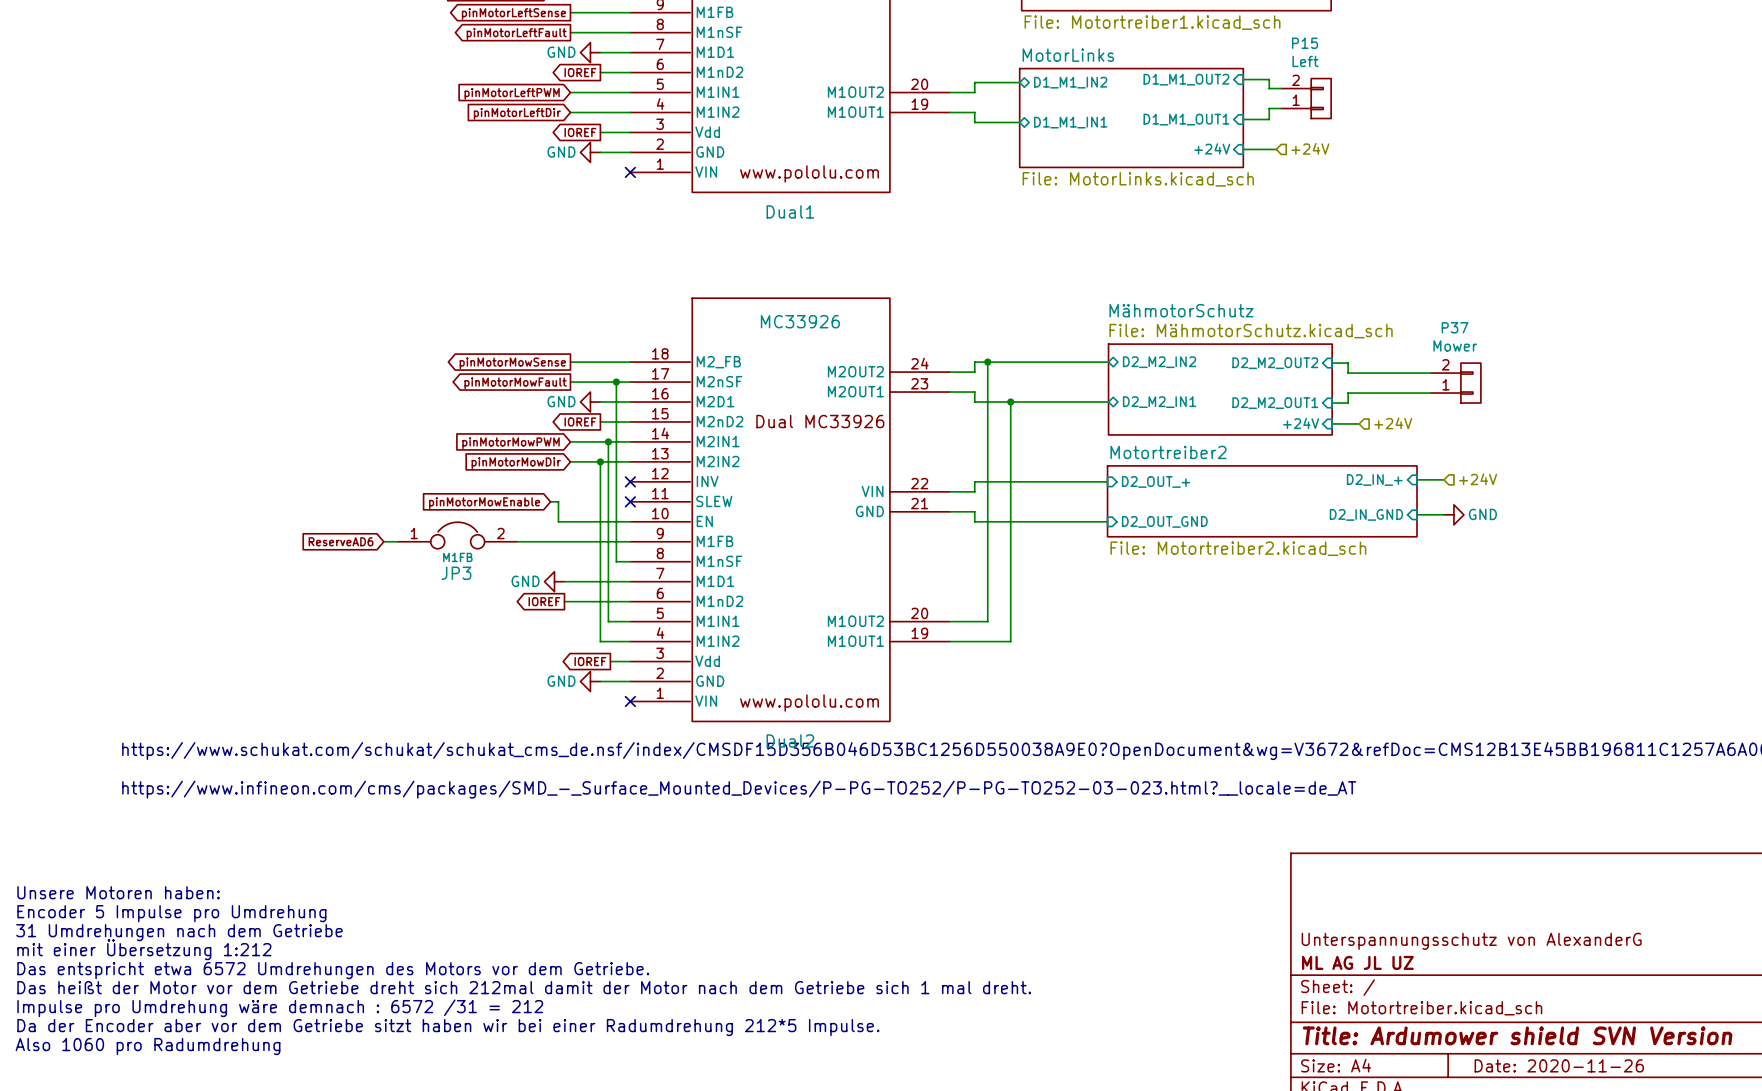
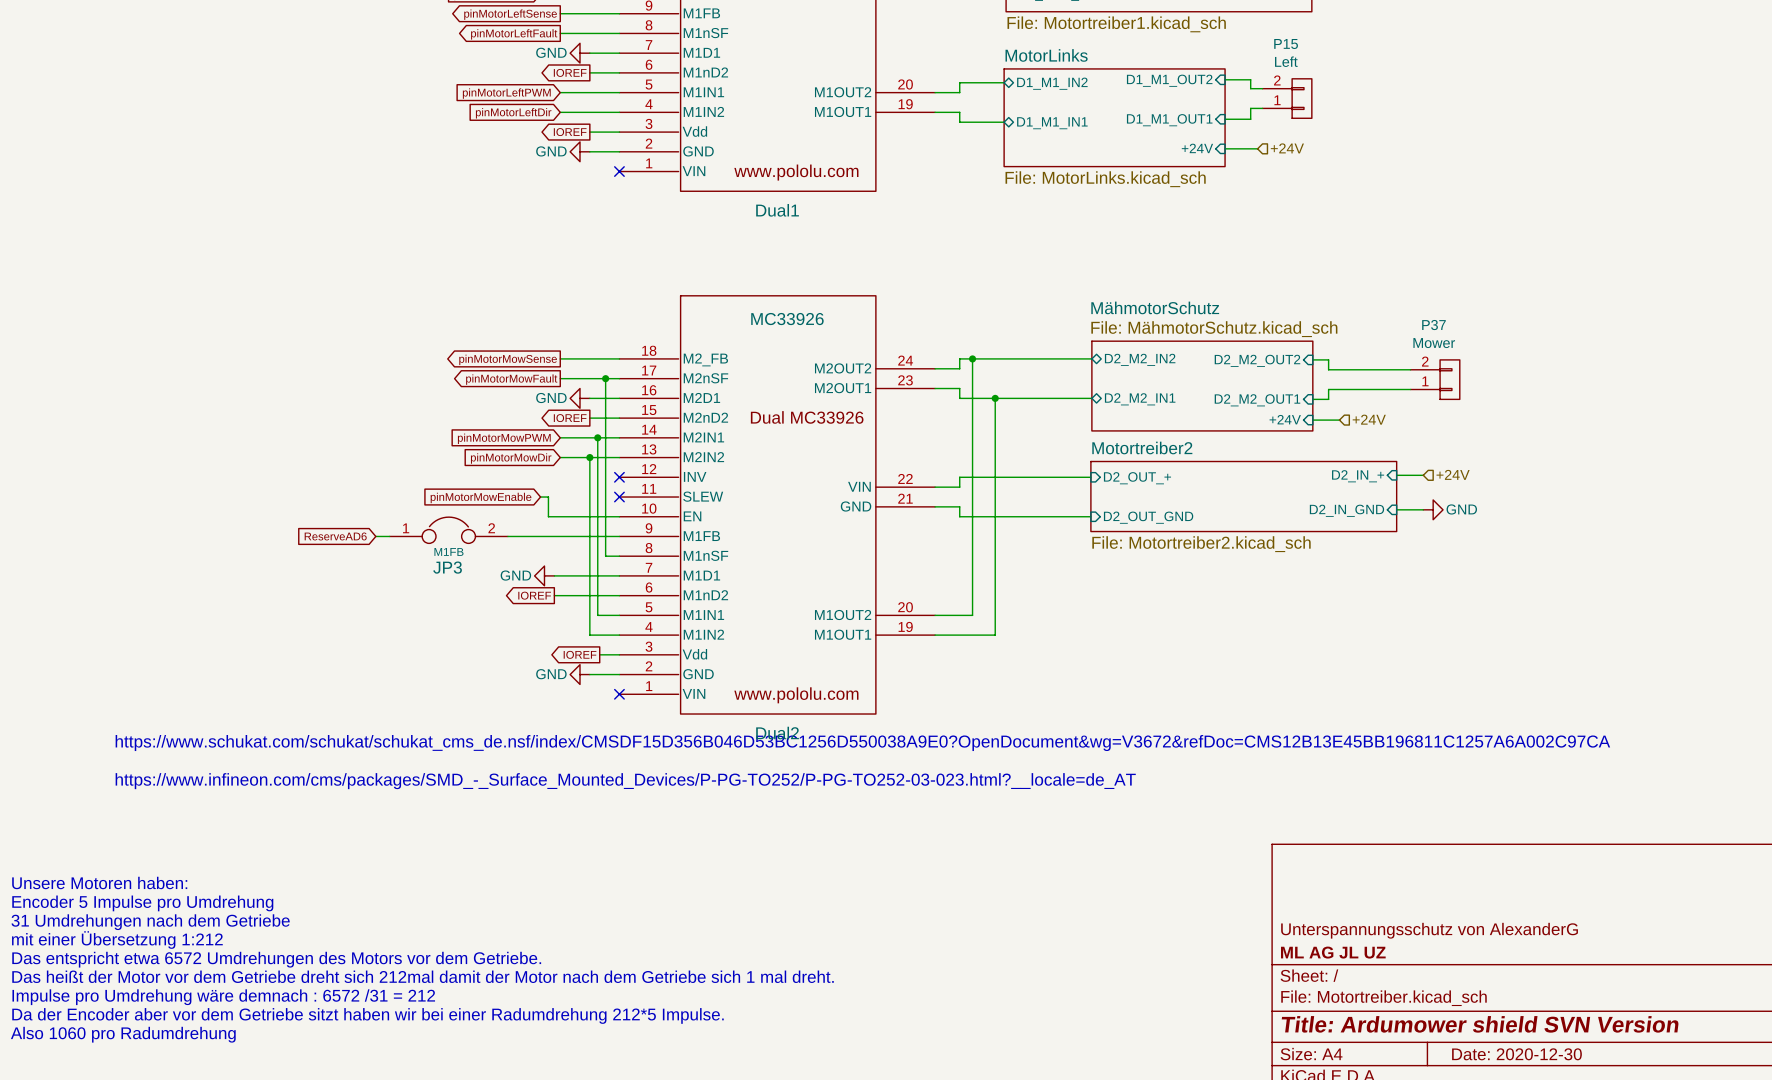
title block: Date: 2020-11-26 (1559, 1065) -> Date: 2020-12-30 (1516, 1054)

